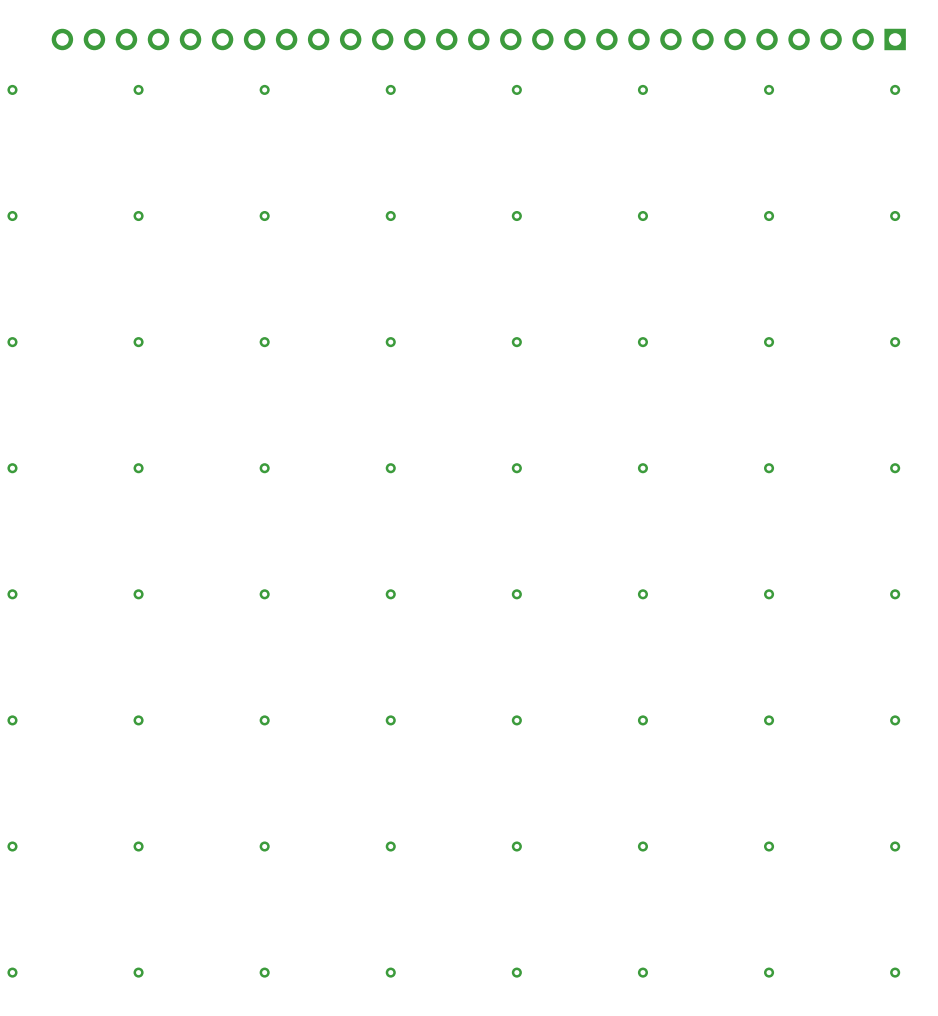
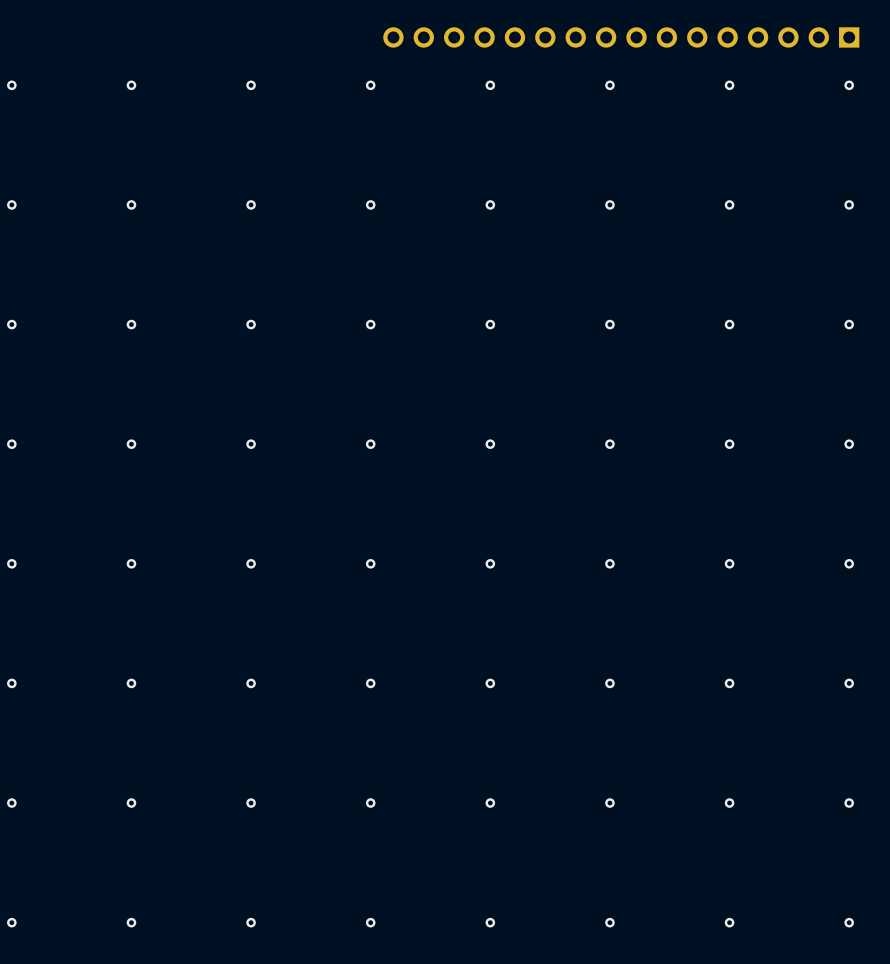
part: (478, 39) -> none

